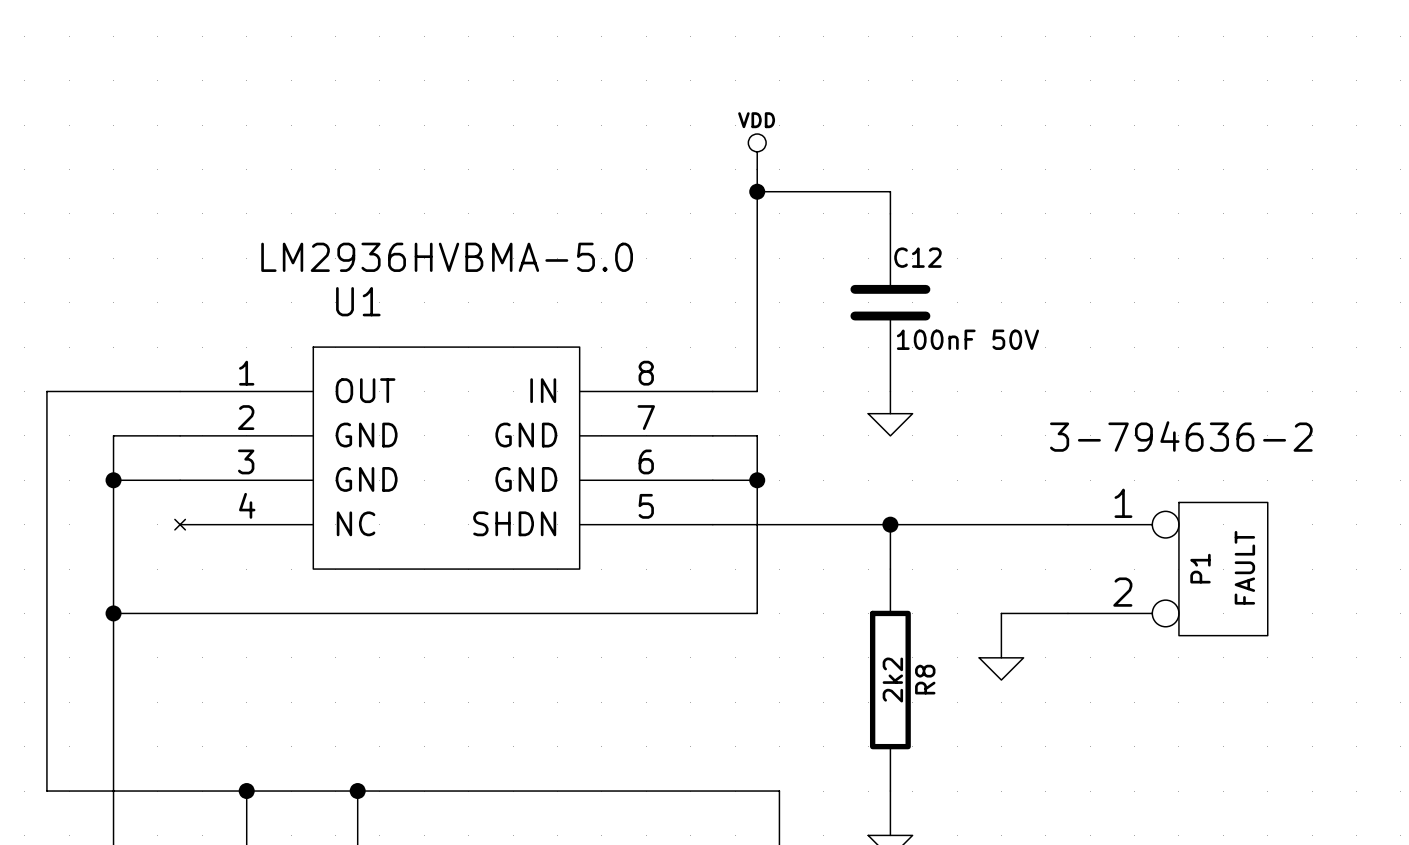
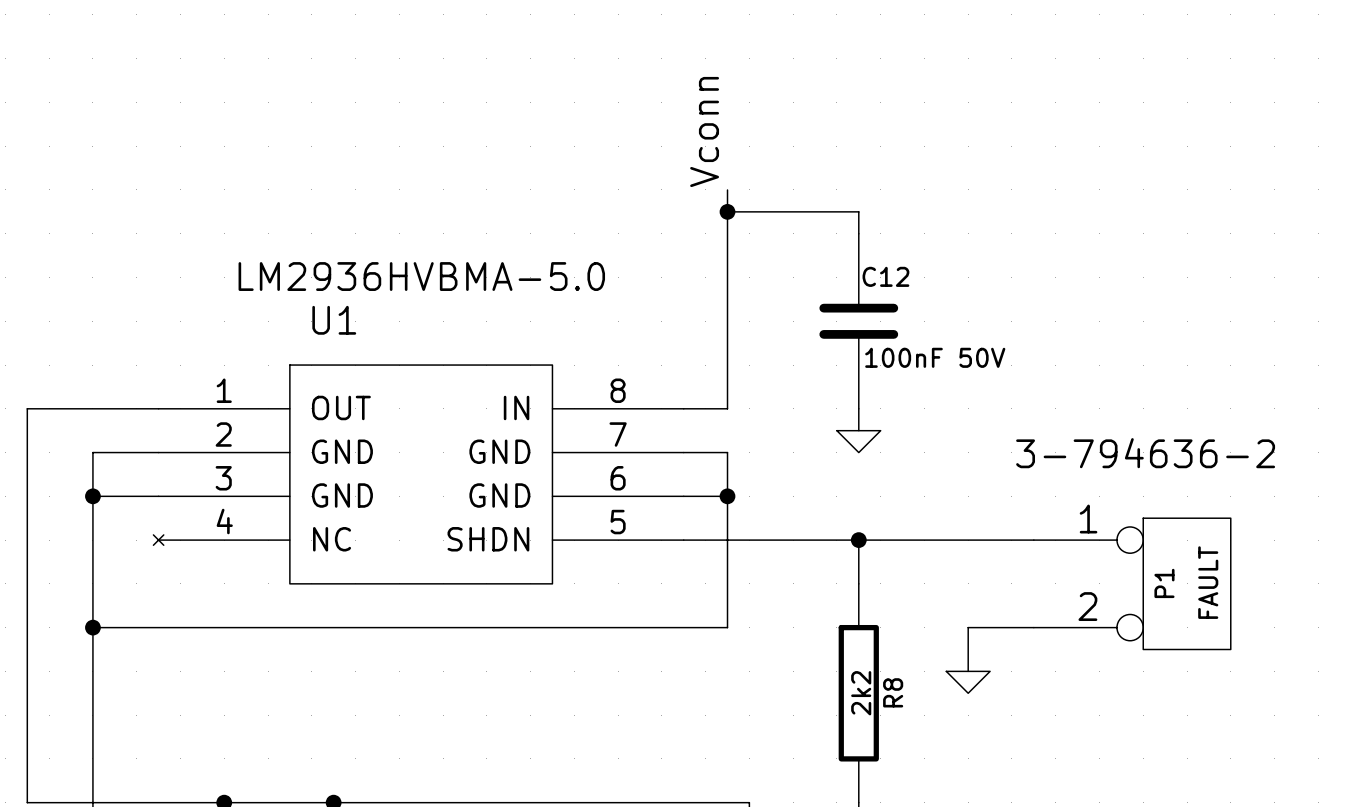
label: none -> Vconn (704, 131)
power symbol: VDD (757, 151) -> none

